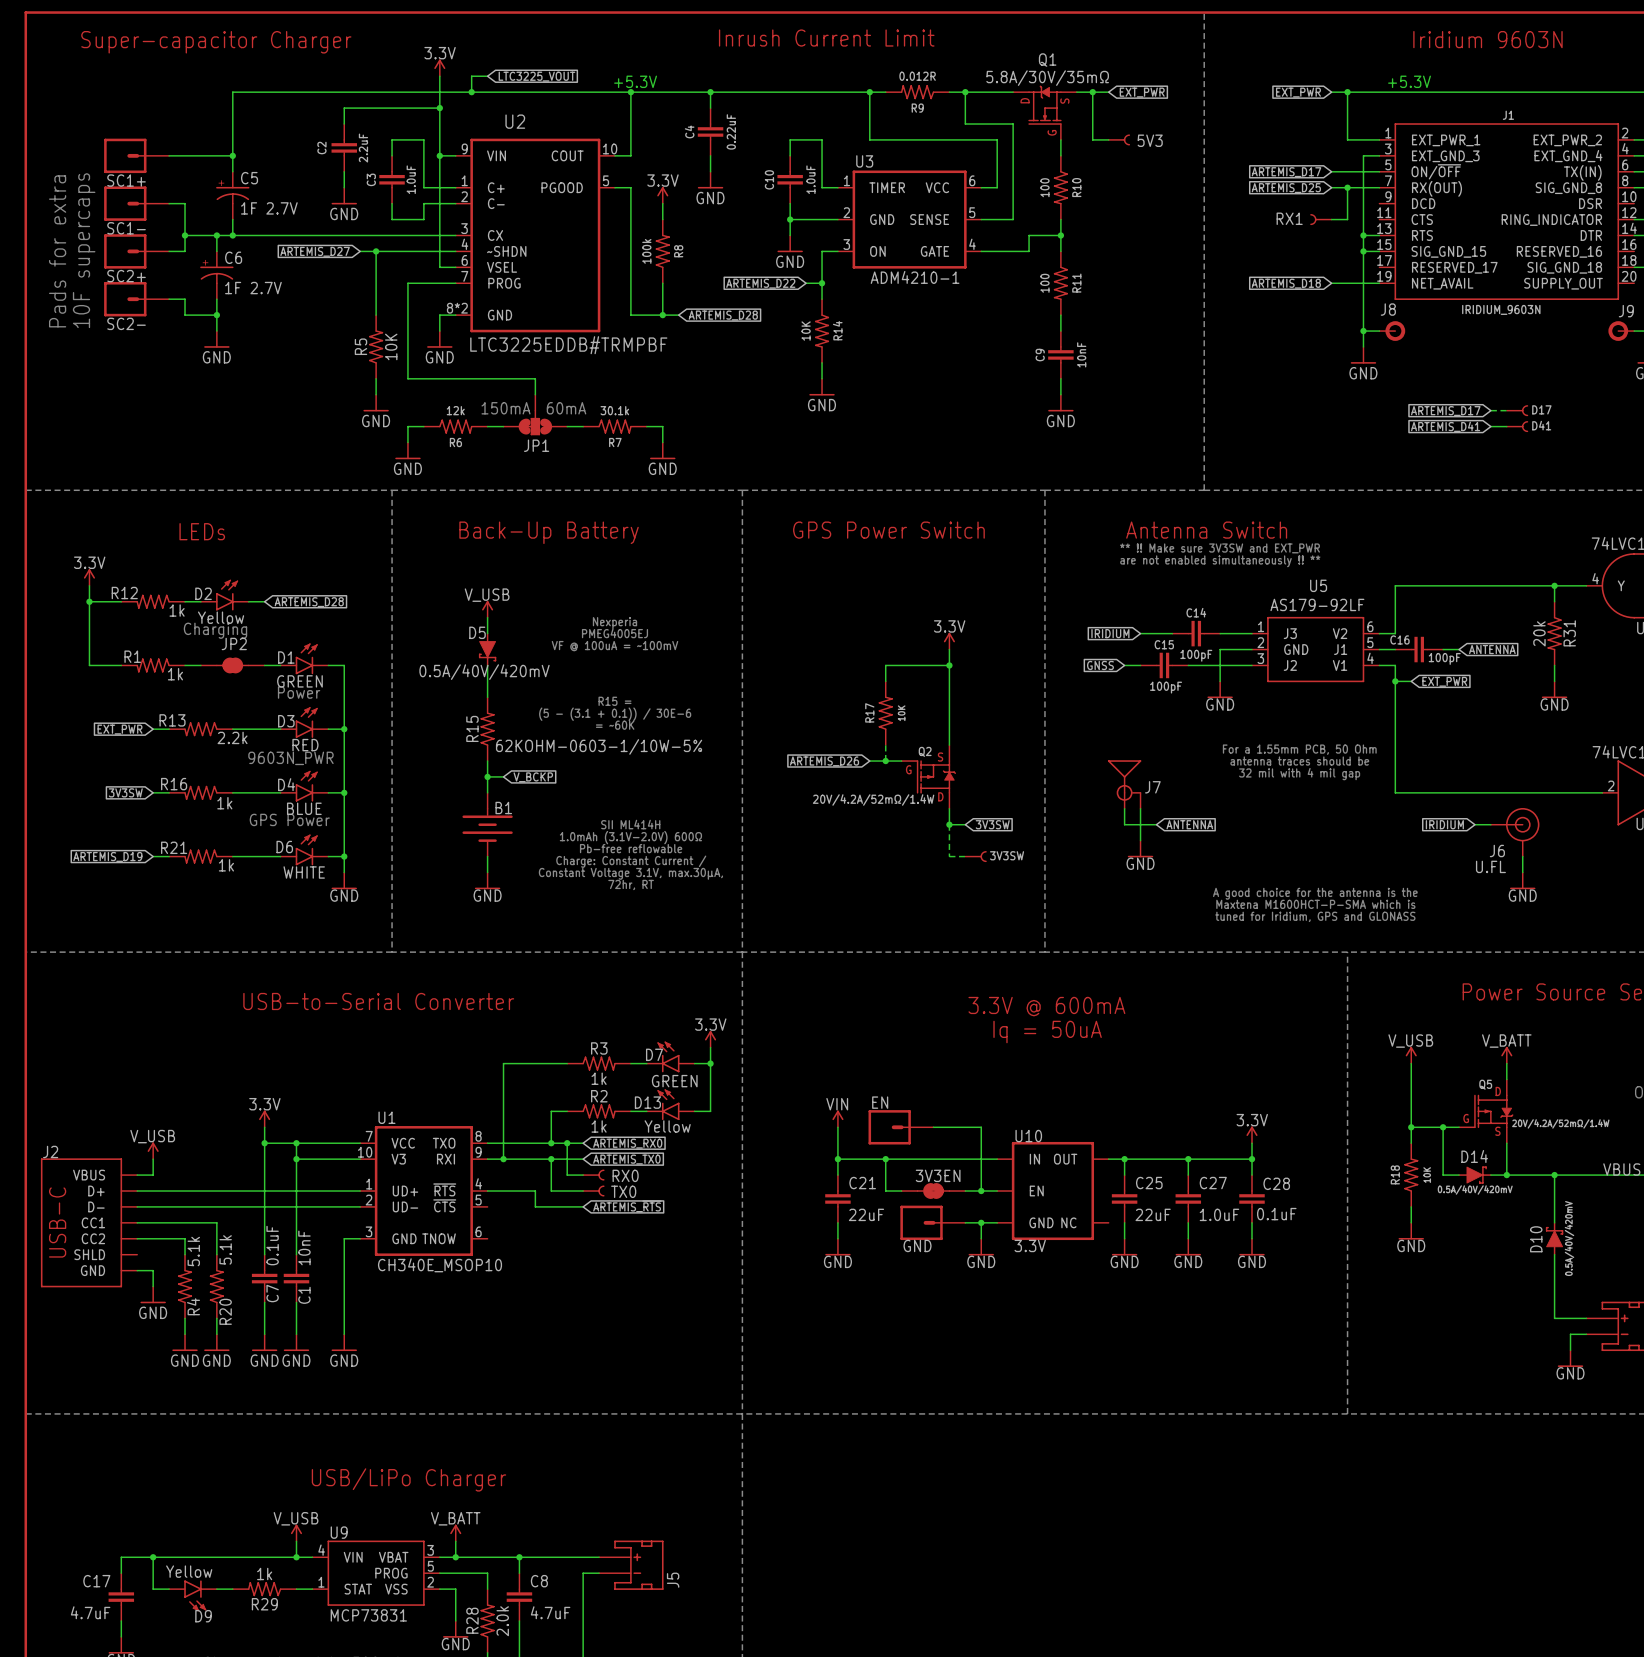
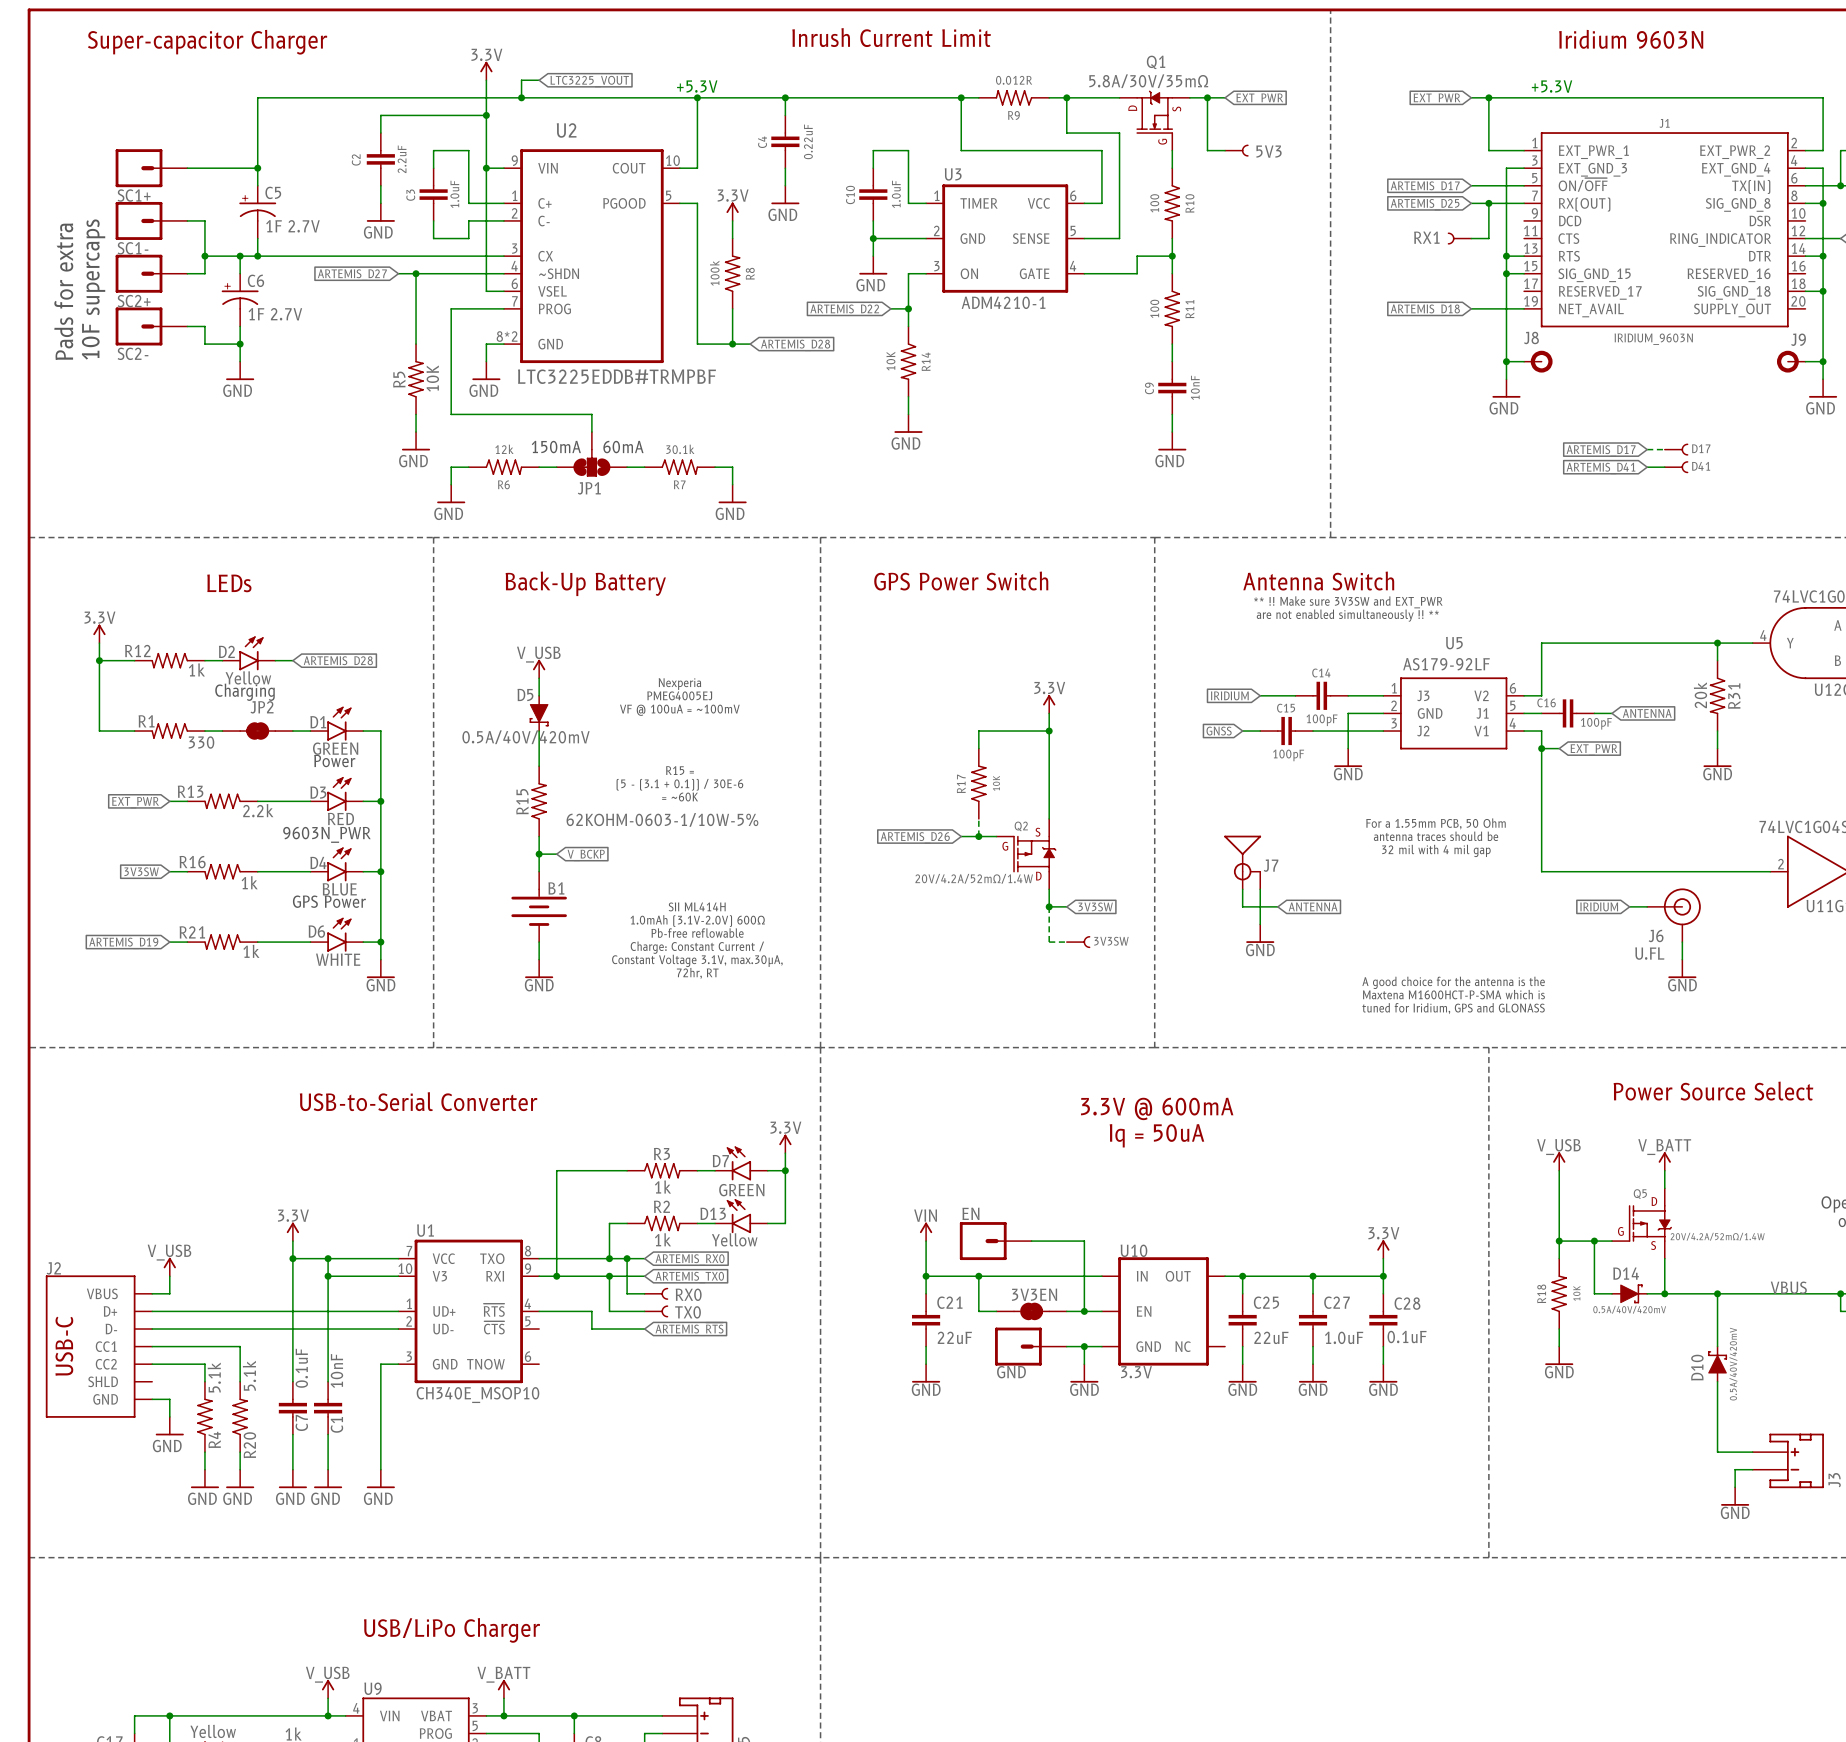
R1 value: 1k (175, 674) -> 330 (201, 742)

